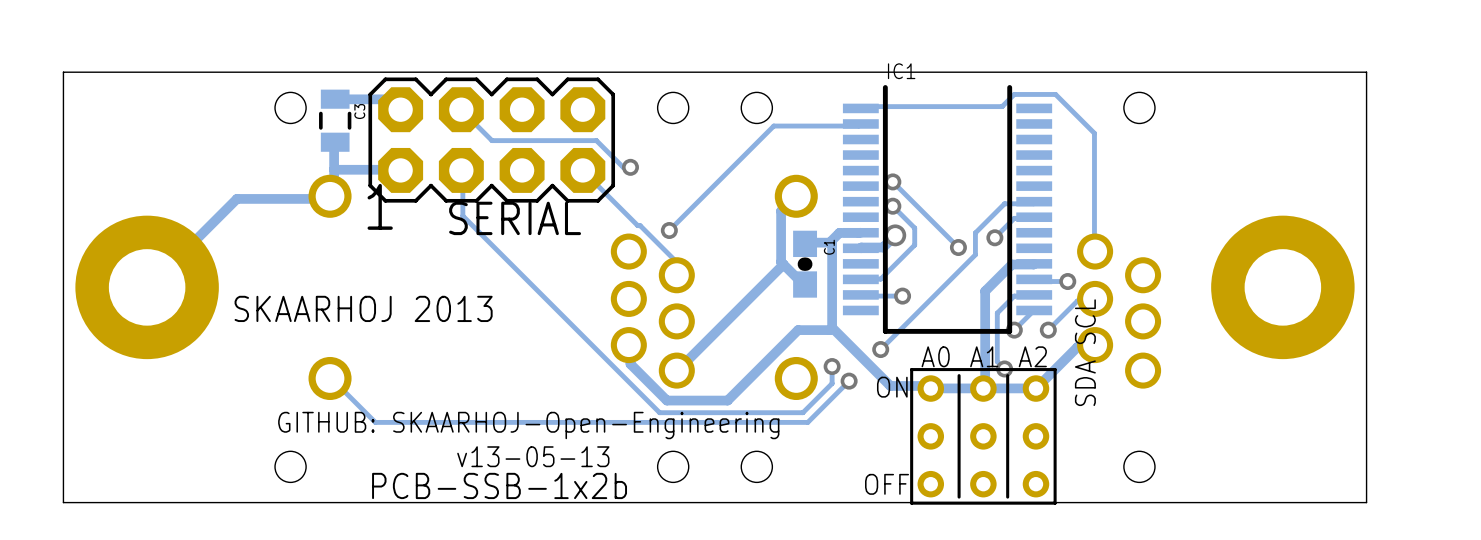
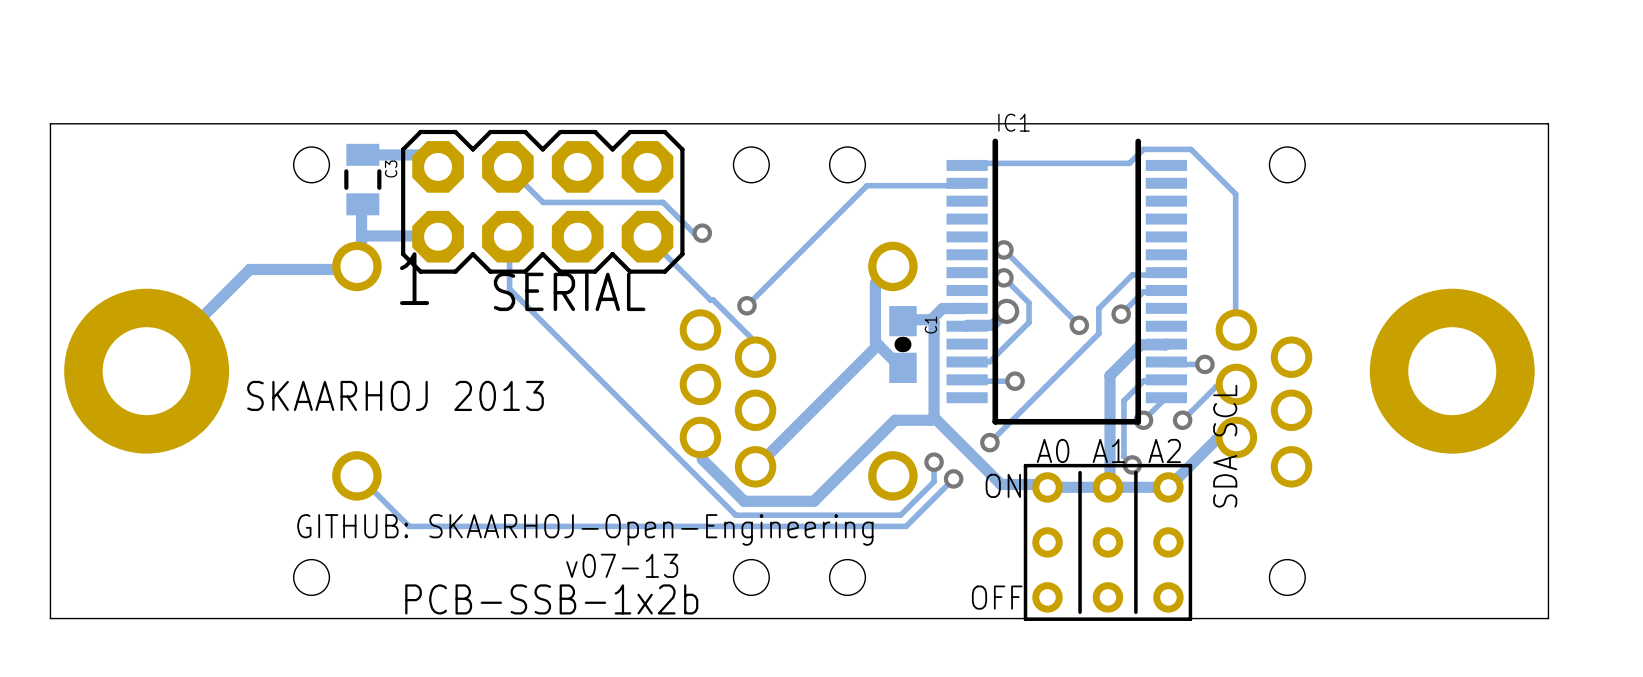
text: v13-05-13 (533, 456) -> v07-13 (622, 565)

